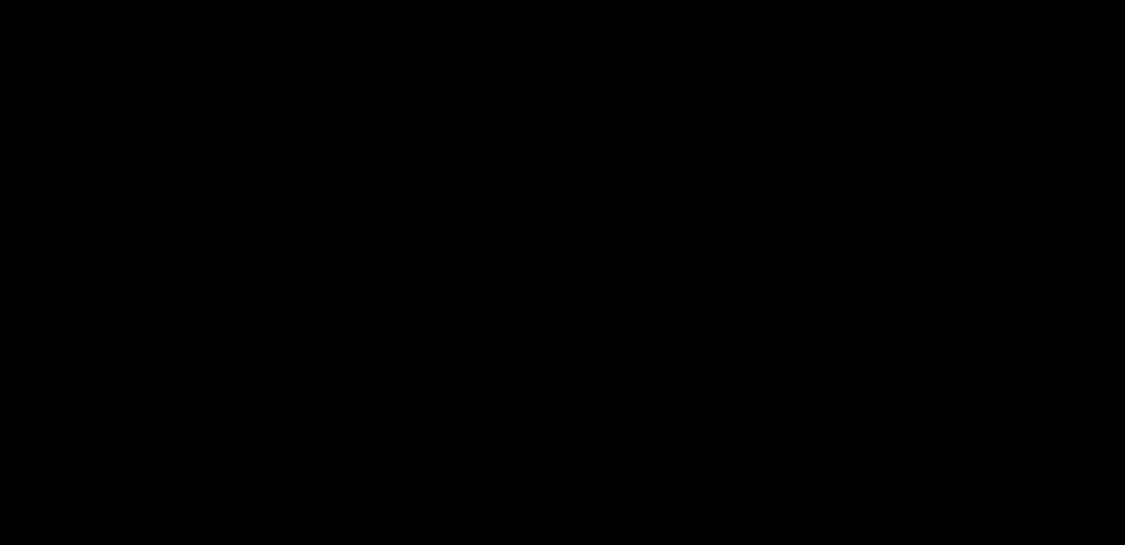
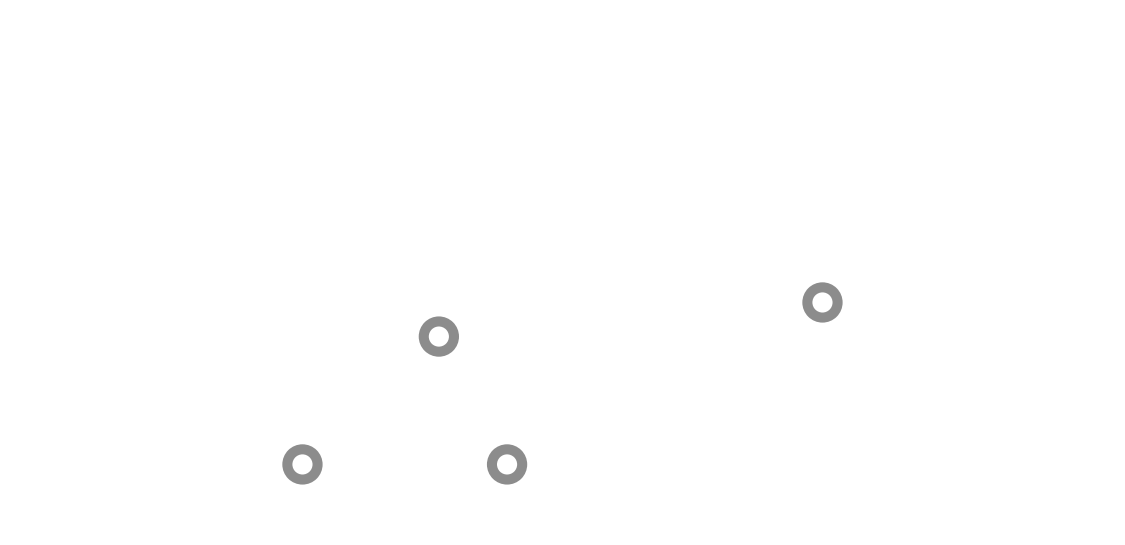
part: none -> (822, 302)
part: none -> (438, 336)
part: none -> (302, 464)
part: none -> (507, 464)

